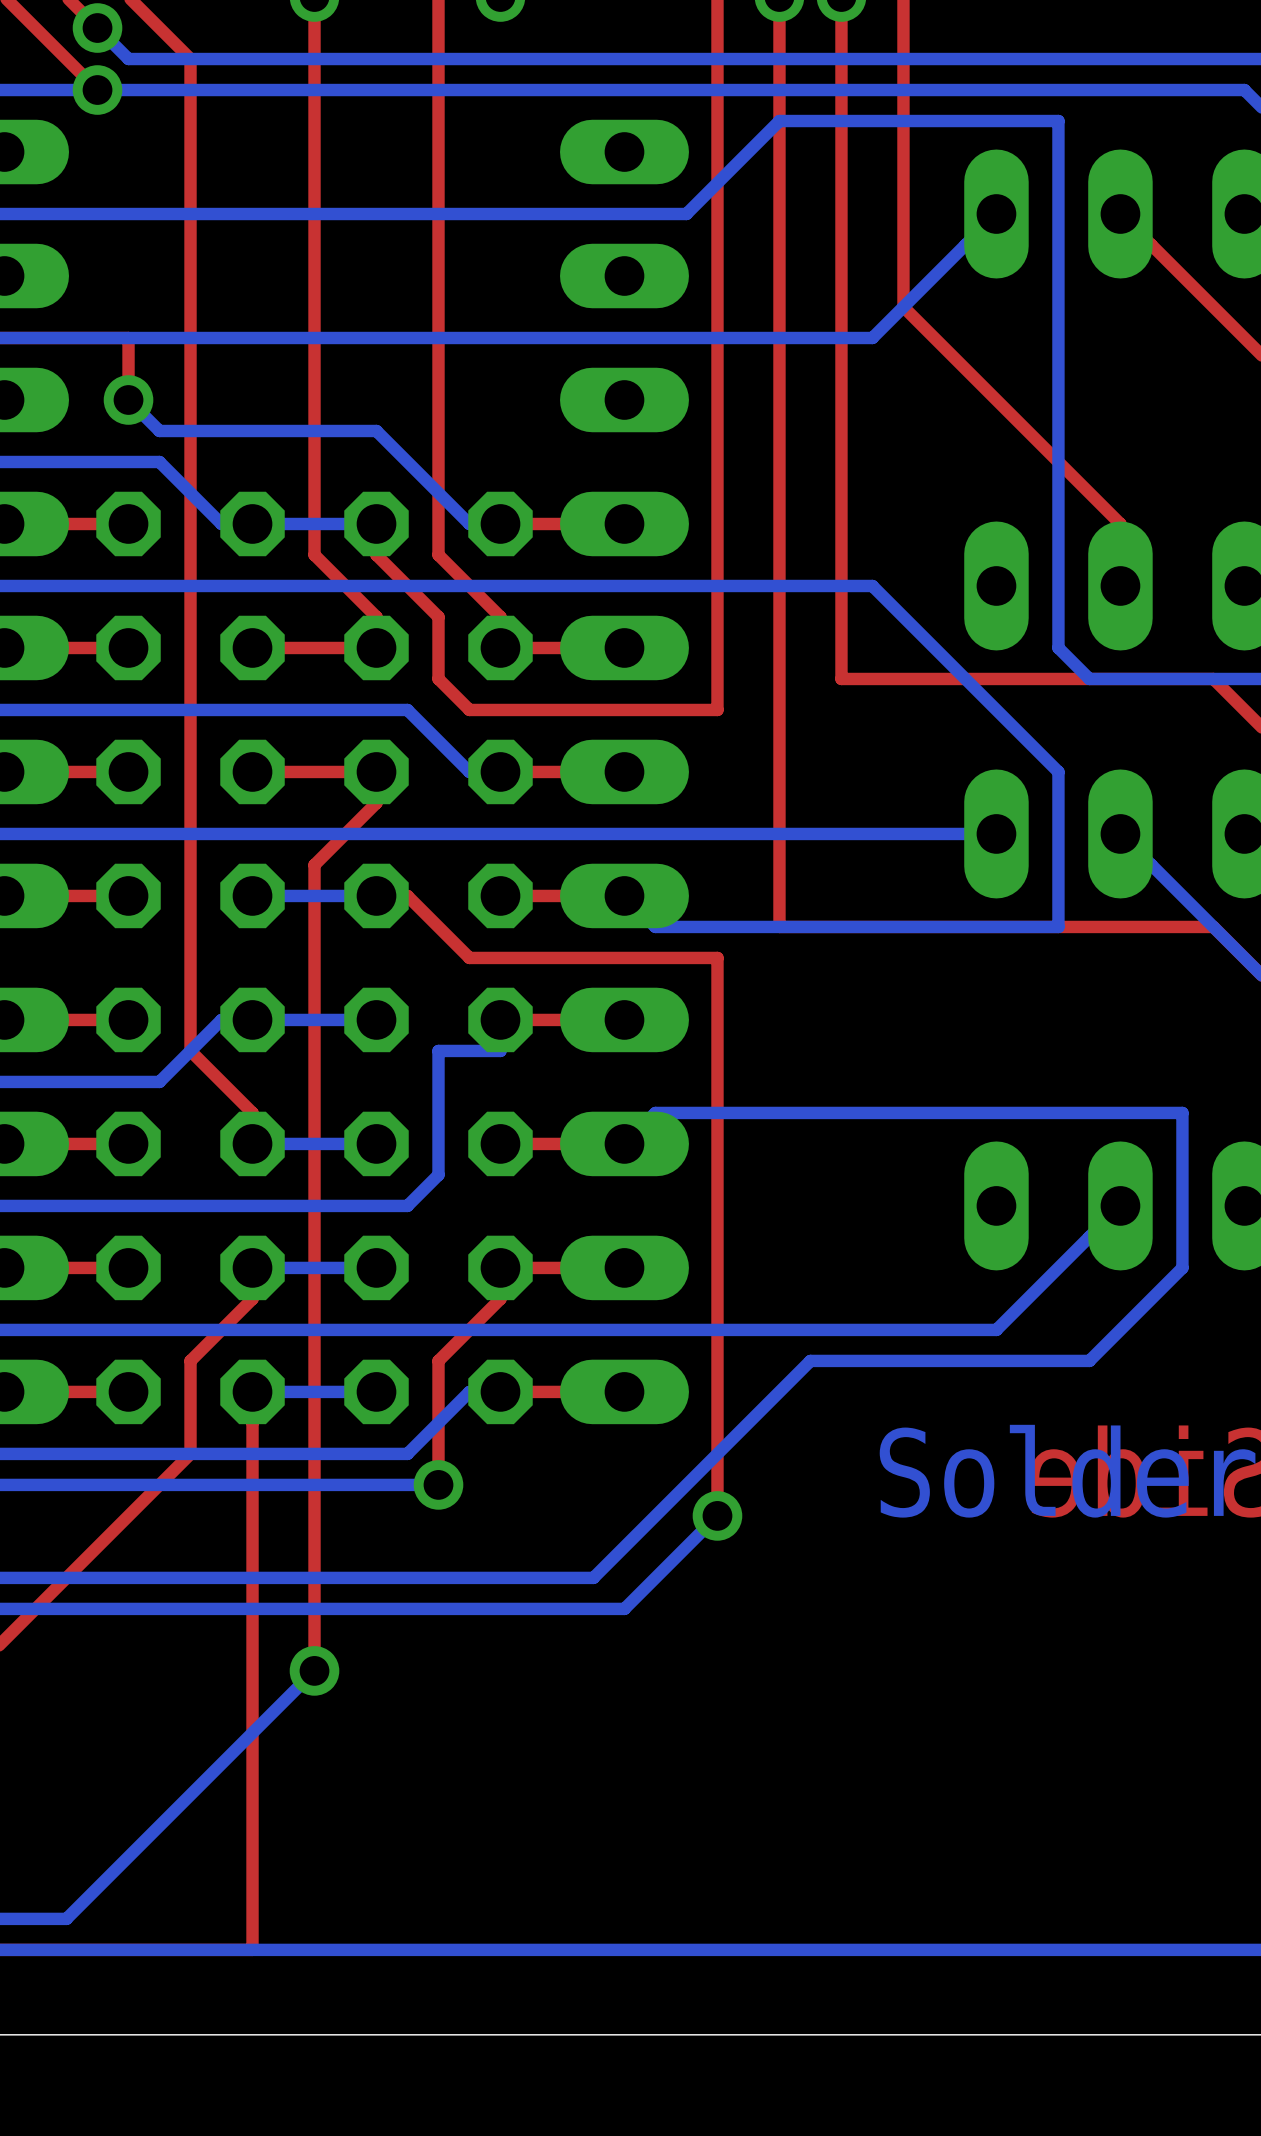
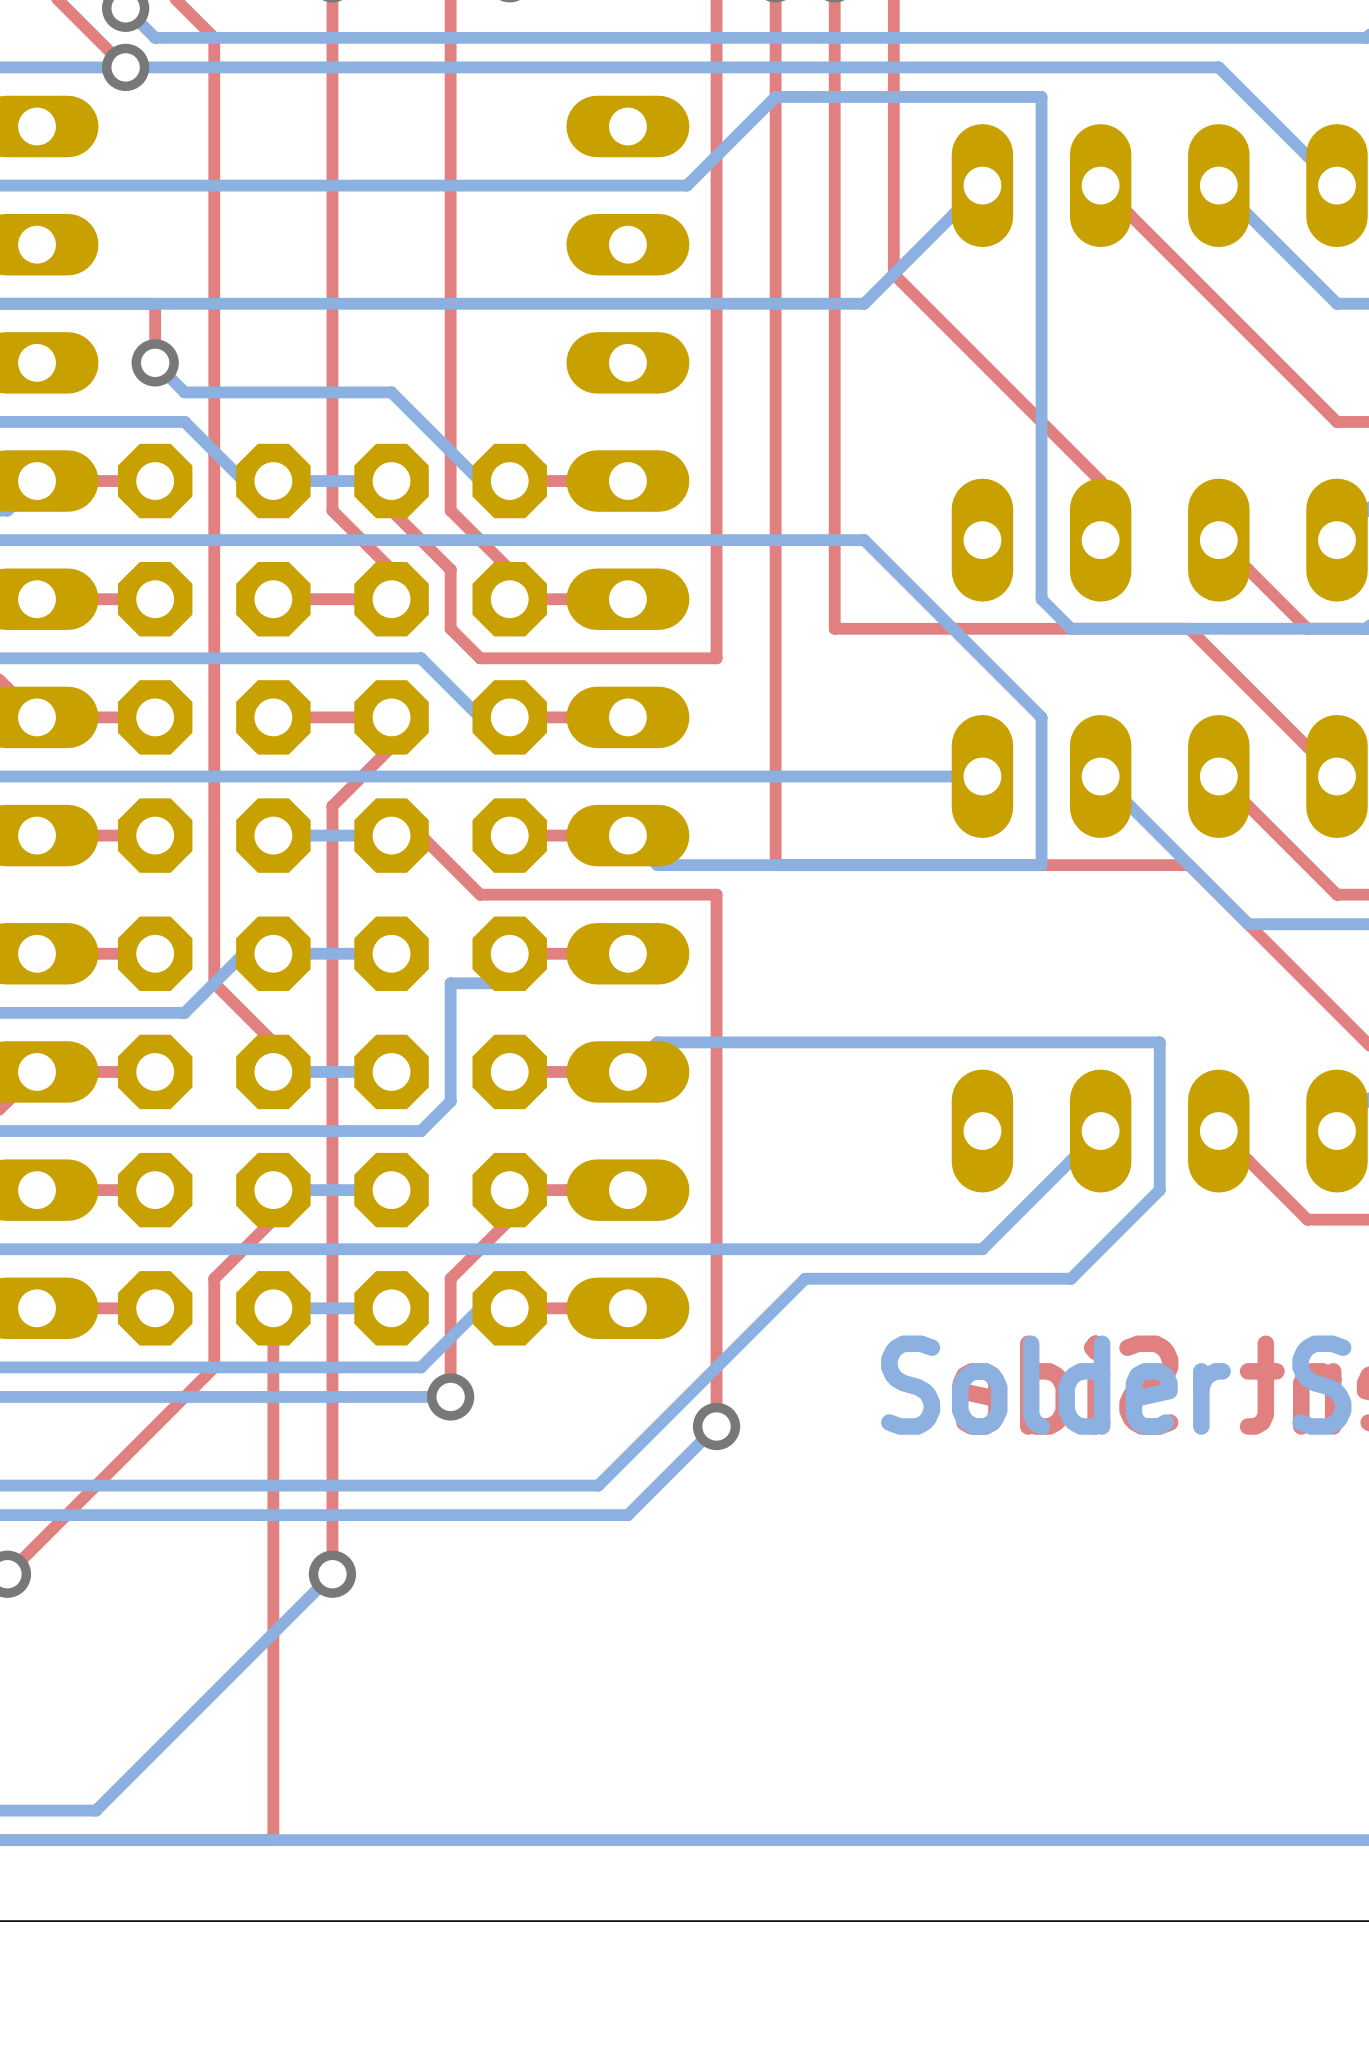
part footprint: [96, 491, 285, 557] -> [117, 443, 311, 519]
part footprint: [344, 491, 533, 557] -> [354, 443, 547, 519]
part footprint: [96, 615, 285, 681] -> [117, 561, 311, 637]
part footprint: [344, 615, 533, 681] -> [354, 561, 547, 637]
part footprint: [96, 739, 285, 805] -> [117, 680, 311, 755]
part footprint: [344, 739, 533, 805] -> [354, 680, 547, 755]
part footprint: [96, 863, 285, 929] -> [117, 798, 311, 873]
part footprint: [344, 863, 533, 929] -> [354, 798, 547, 873]
part footprint: [96, 987, 285, 1053] -> [117, 916, 311, 991]
part footprint: [344, 987, 533, 1053] -> [354, 916, 547, 991]
part footprint: [96, 1111, 285, 1177] -> [117, 1034, 311, 1110]
part footprint: [344, 1111, 533, 1177] -> [354, 1034, 547, 1110]
part footprint: [96, 1235, 285, 1301] -> [117, 1152, 311, 1228]
part footprint: [344, 1235, 533, 1301] -> [354, 1152, 547, 1228]
part footprint: [96, 1359, 285, 1425] -> [117, 1271, 311, 1346]
part footprint: [344, 1359, 533, 1425] -> [354, 1271, 547, 1346]

